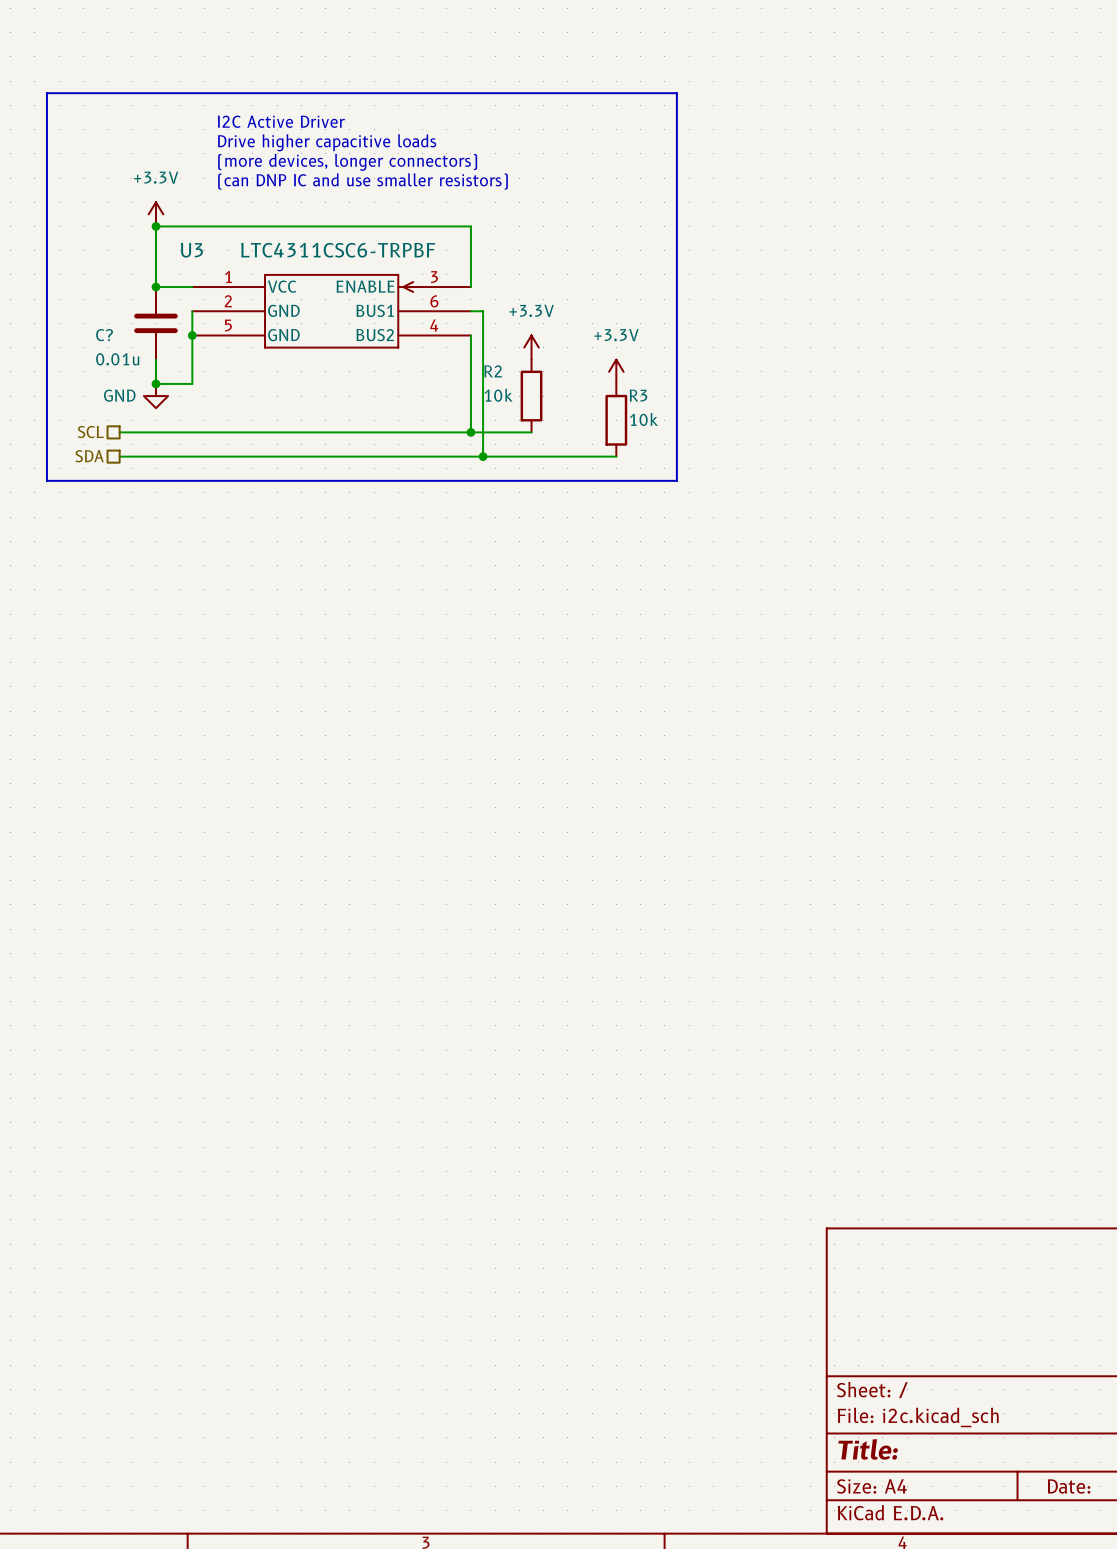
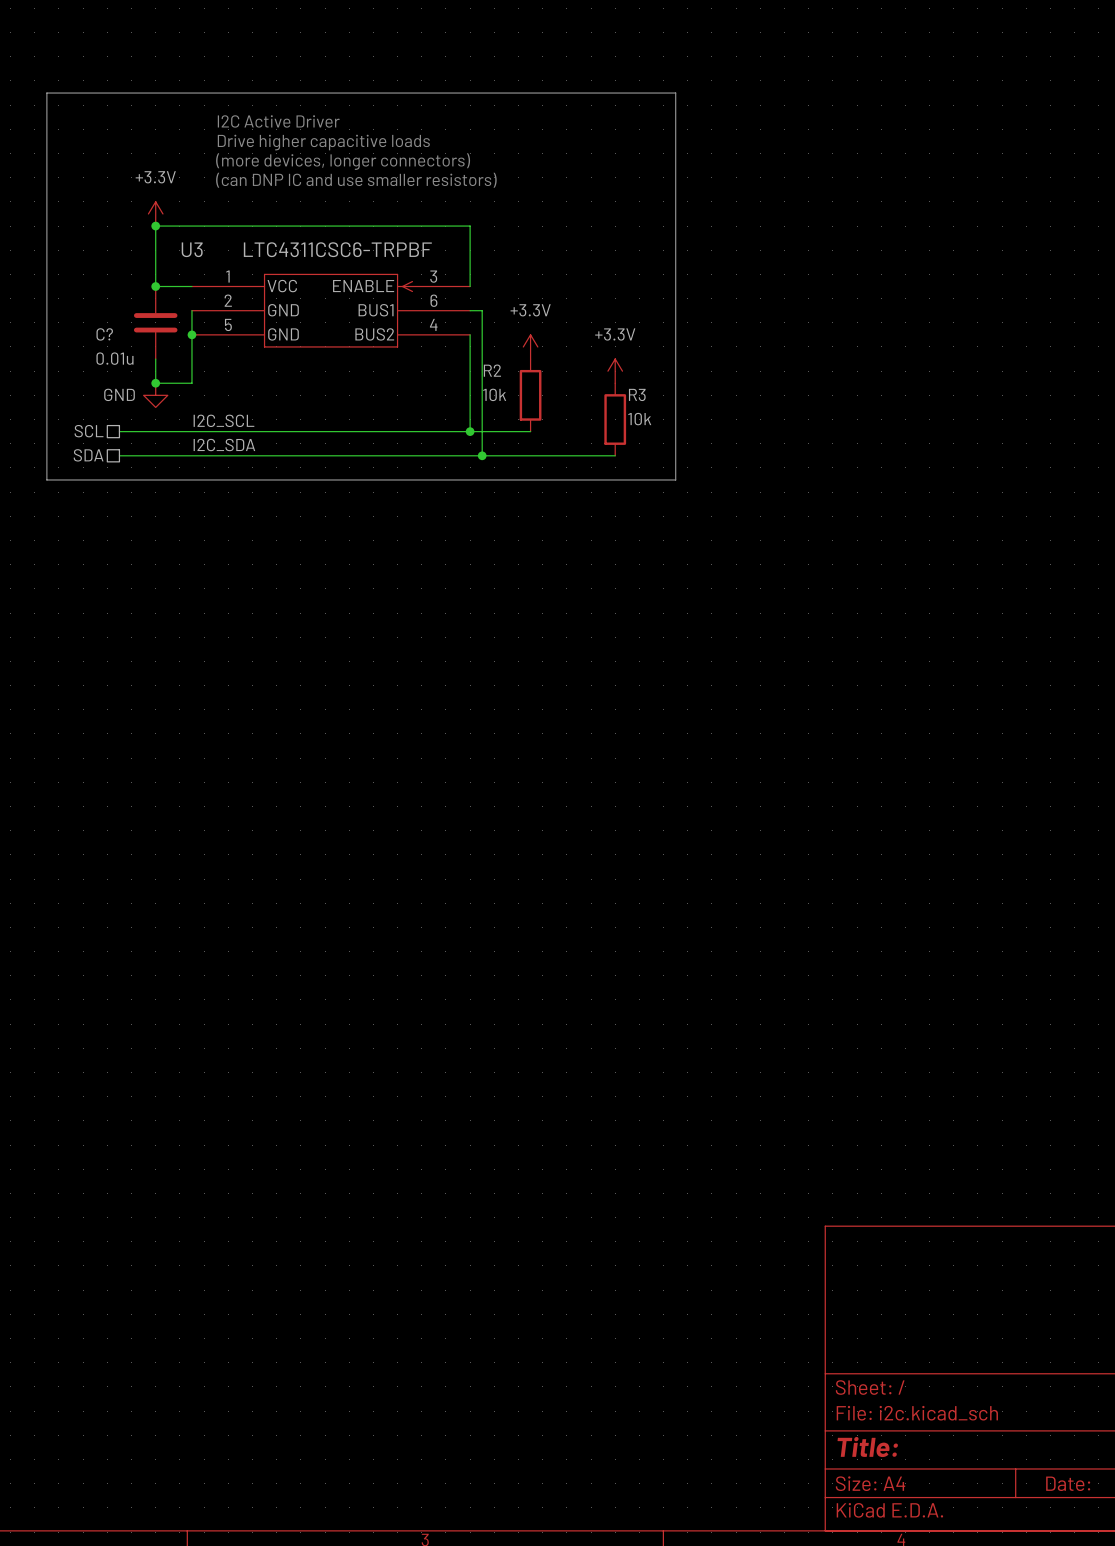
label: none -> I2C_SCL (223, 420)
label: none -> I2C_SDA (224, 445)

